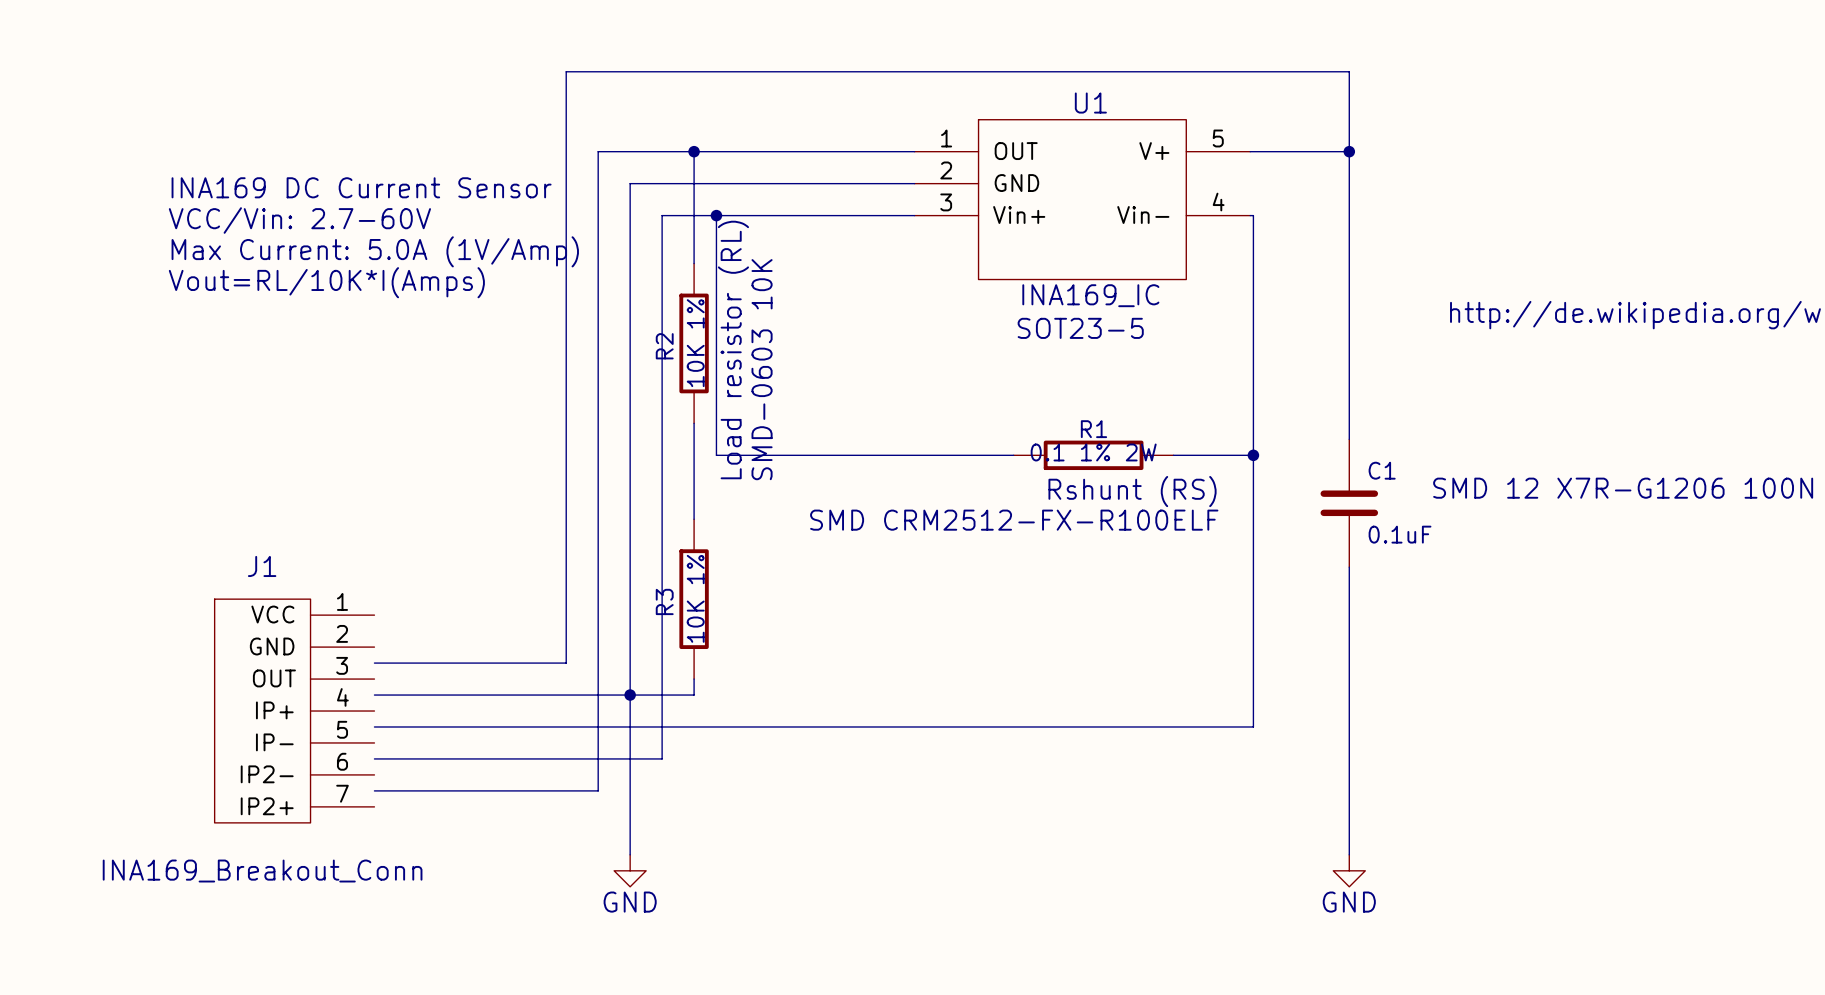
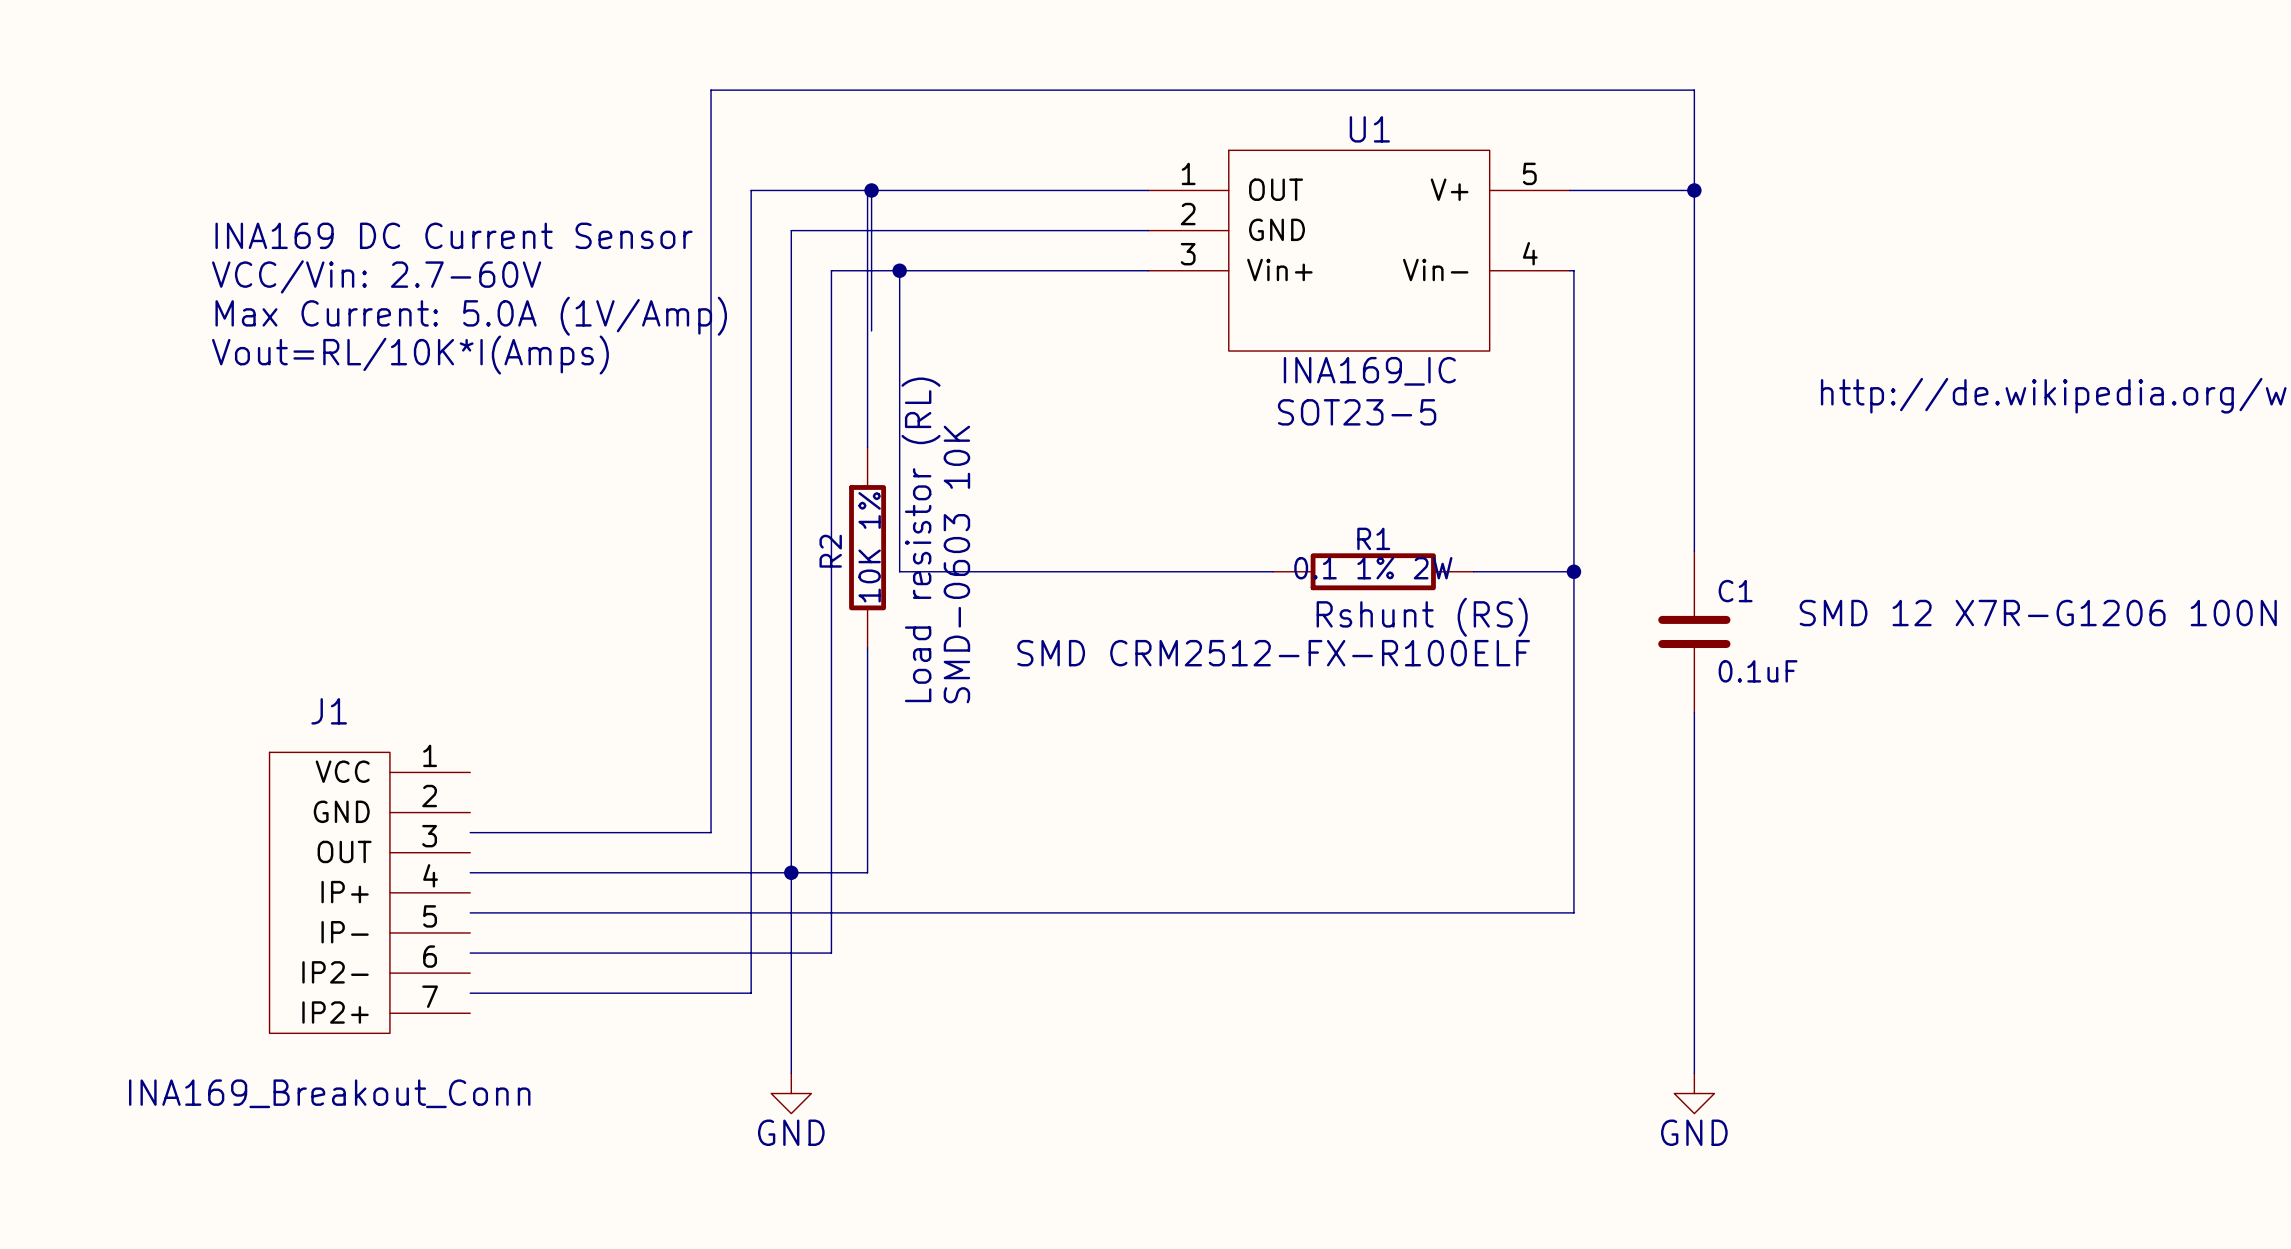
wire: none -> (867, 190) (867, 447)
R2 position: (694, 343) -> (867, 547)
text position: Load resistor (RL) (733, 350) -> Load resistor (RL) (921, 539)
text position: SMD-0603 10K (762, 369) -> SMD-0603 10K (956, 564)
wire: (694, 423) (694, 519) -> none
R3: 10K 1% (694, 599) -> none
wire: (694, 679) (694, 695) (690, 695) -> (867, 648) (867, 872)

